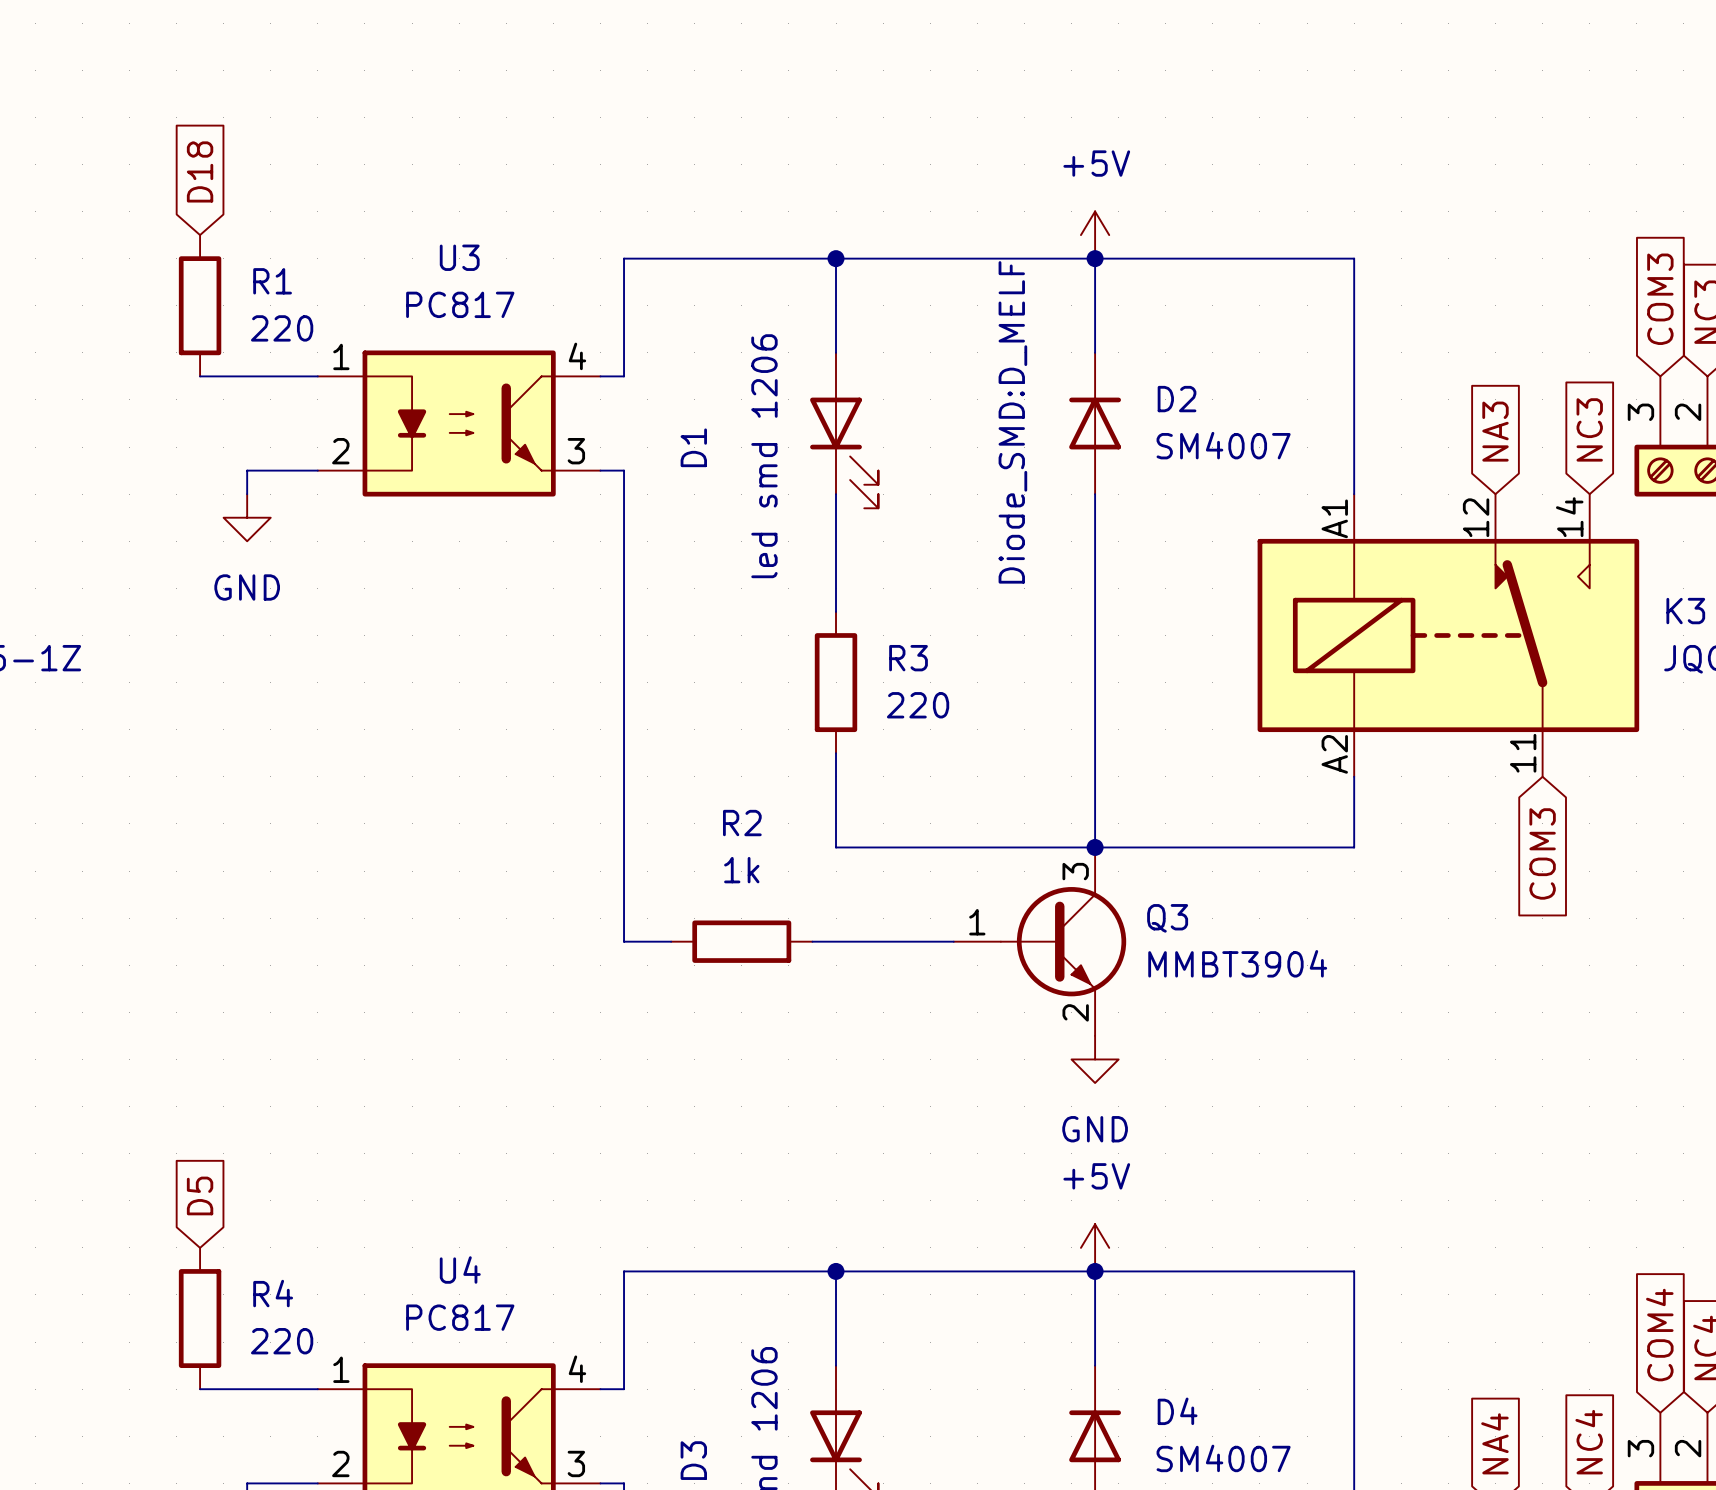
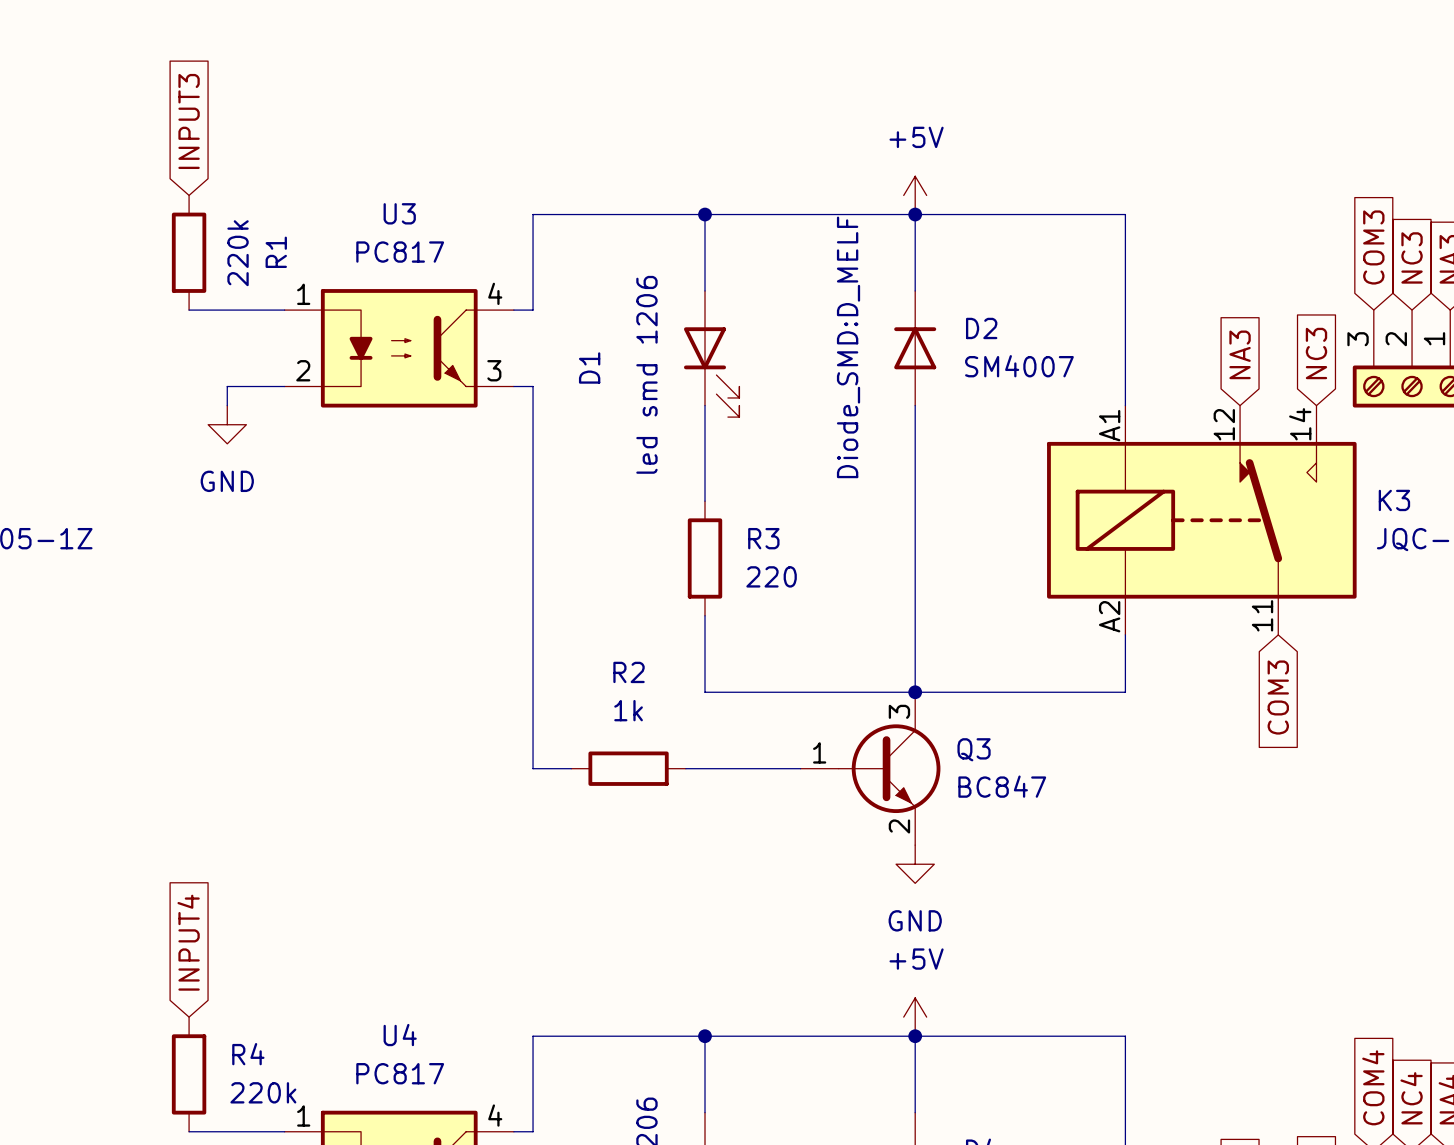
global label: D18 (200, 171) -> INPUT3 (189, 121)
R1 name rotation: 0° (272, 281) -> 90° counterclockwise (276, 252)
R1 value: 220 (282, 328) -> 220k (238, 253)
Q3 value: MMBT3904 (1237, 963) -> BC847 (1002, 786)
global label: D5 (200, 1195) -> INPUT4 (188, 942)
R4 value: 220 (282, 1341) -> 220k (263, 1092)

